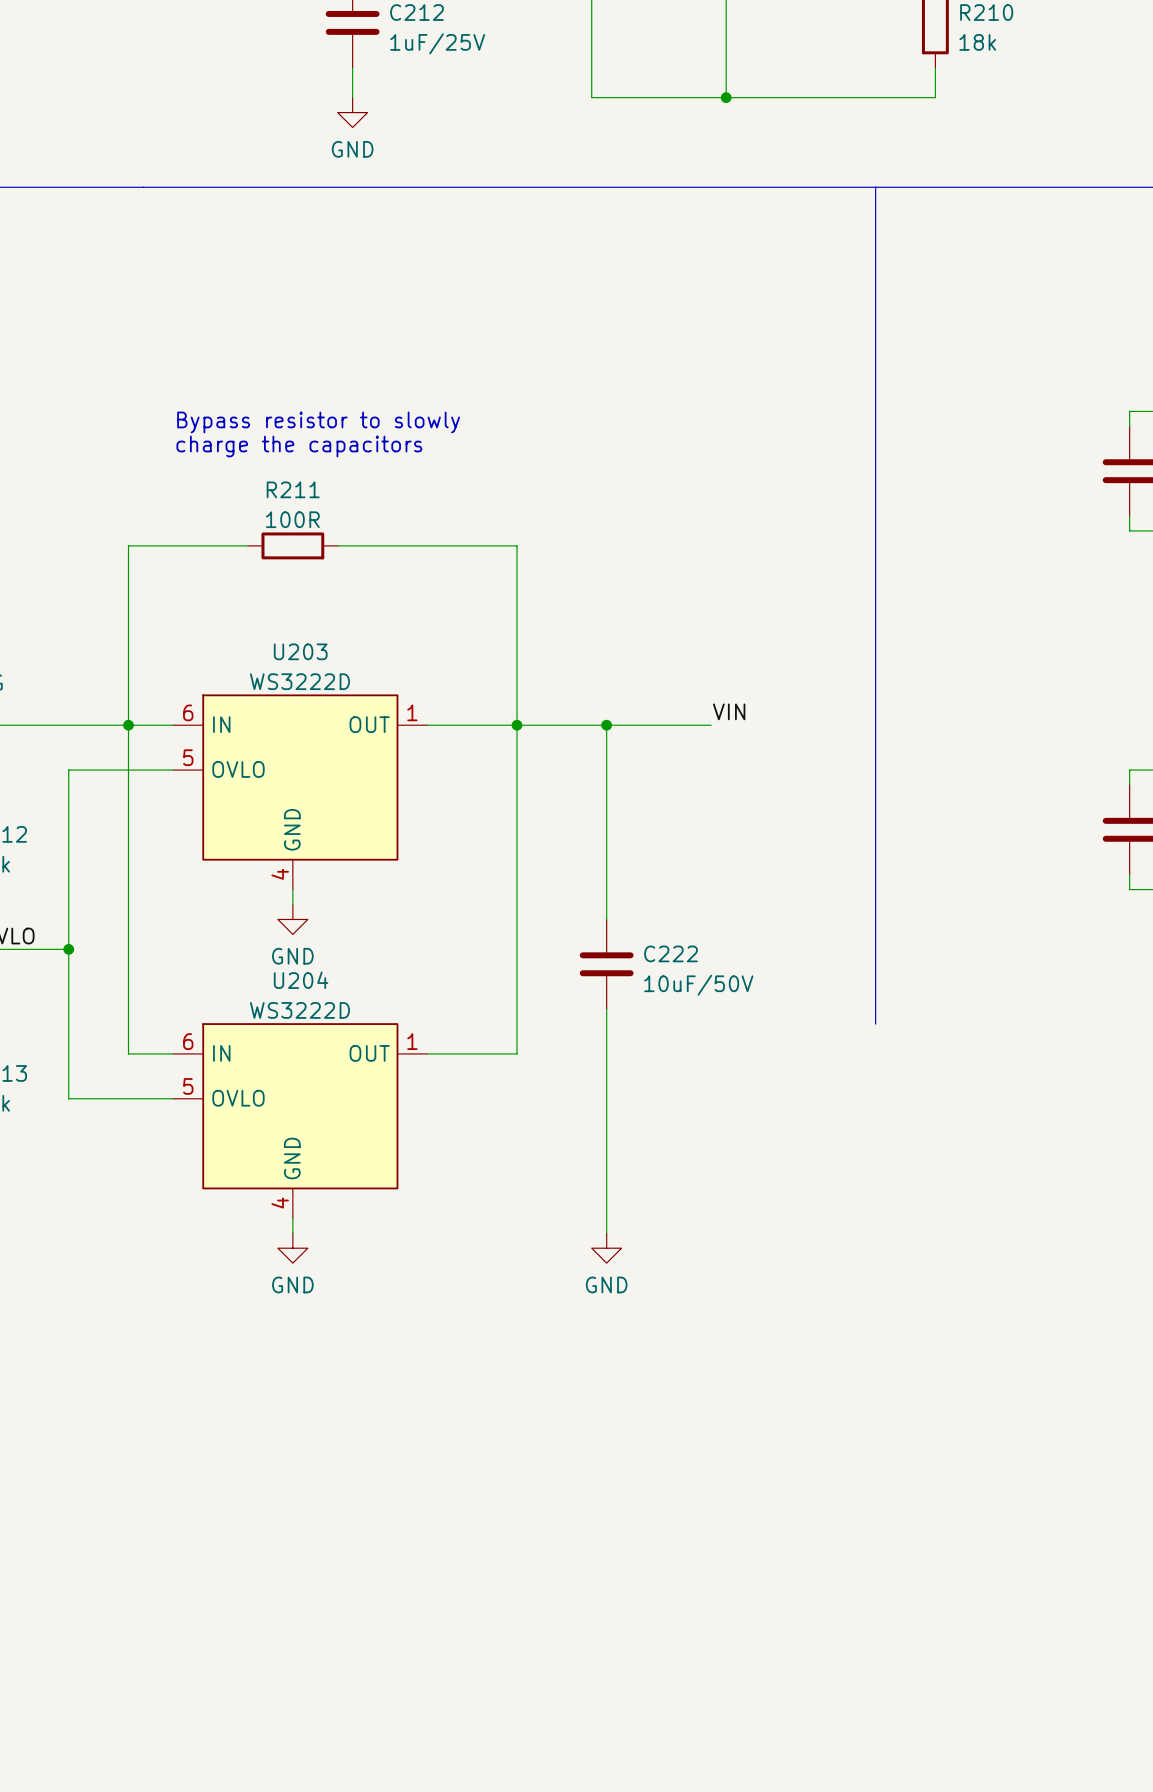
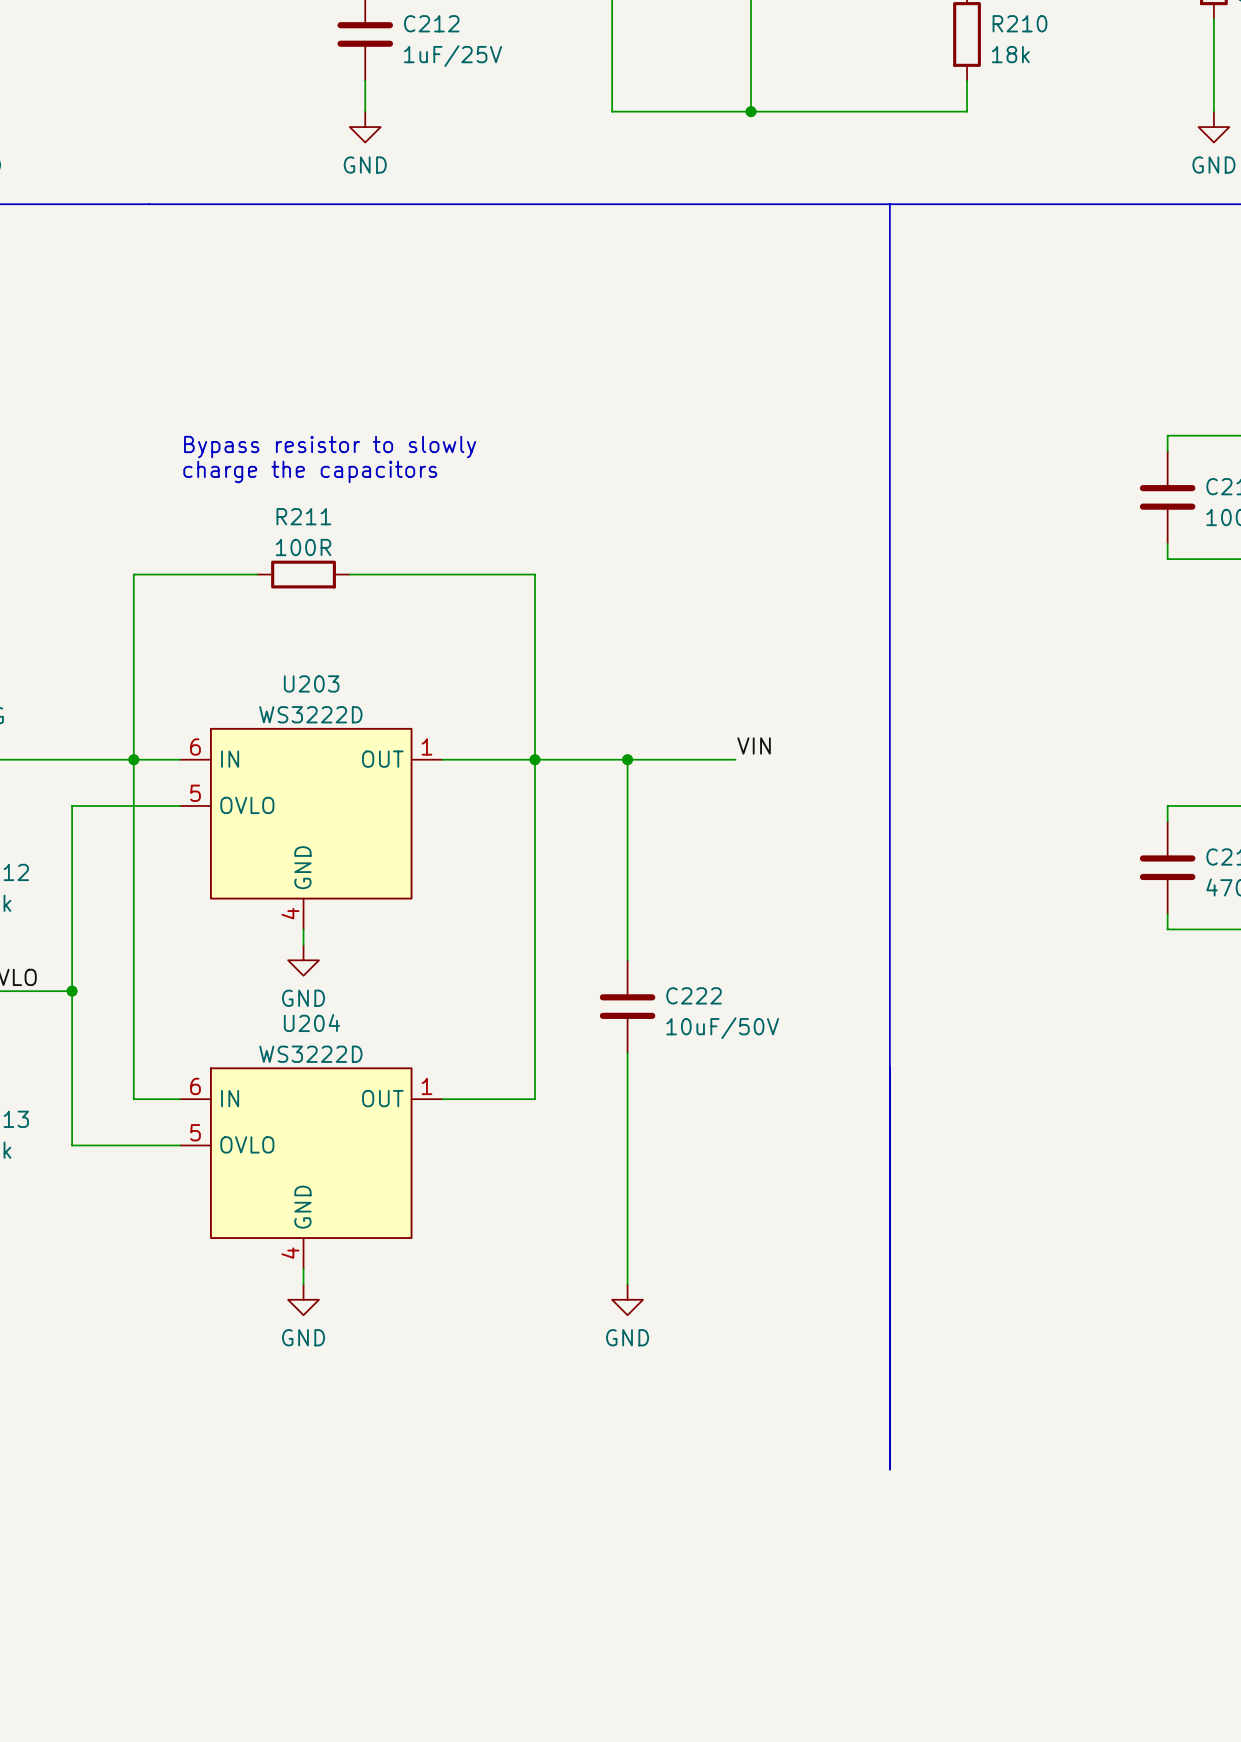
line: none -> (889, 204) (889, 1469)
line: (875, 187) (875, 1024) -> none

